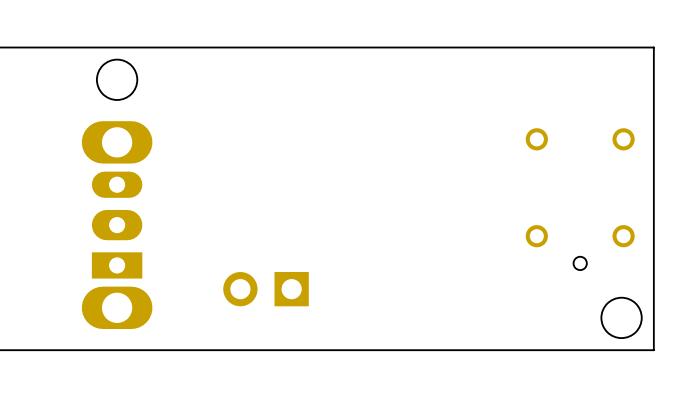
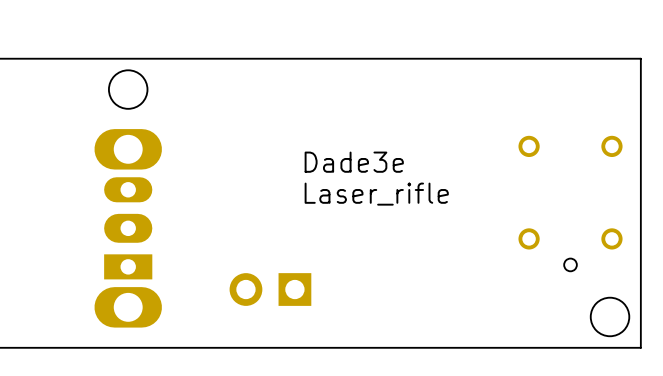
text: none -> Dade3e (354, 162)
text: none -> Laser_rifle (376, 194)

